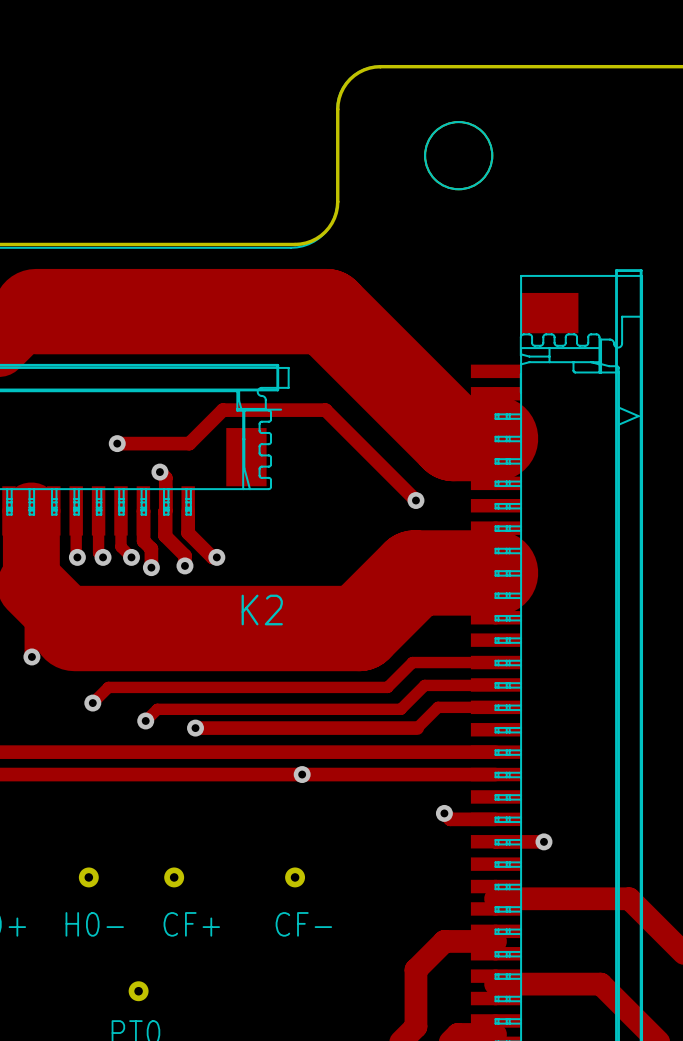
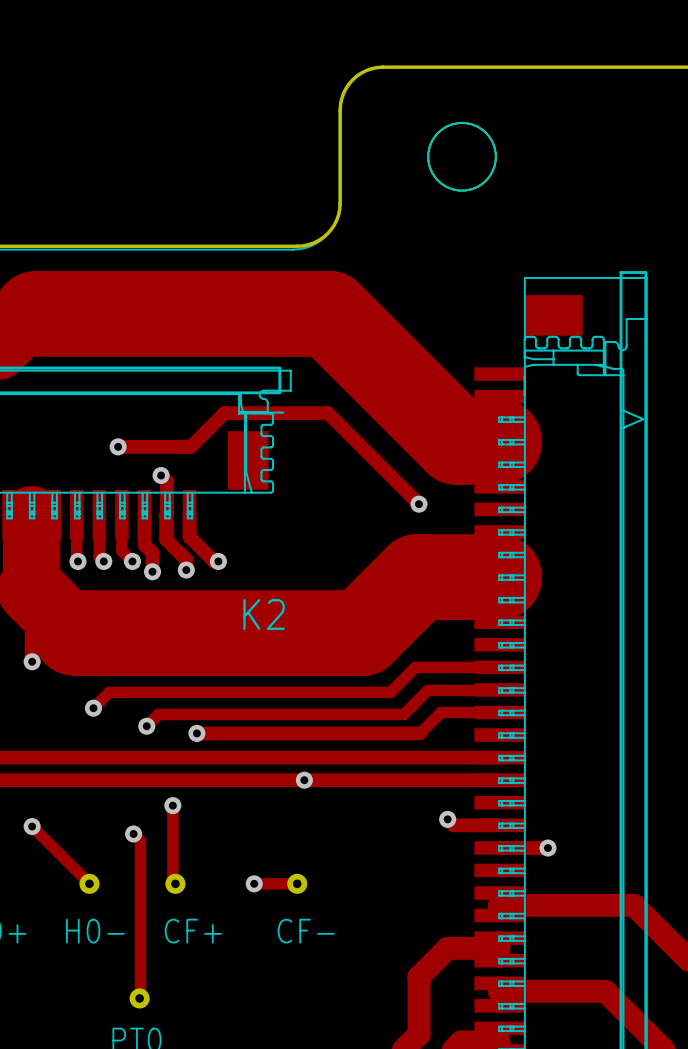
track: none -> (172, 805) (172, 881) (175, 883)
via: none -> (172, 805)
track: none -> (32, 826) (89, 883)
via: none -> (32, 826)
track: none -> (133, 833) (140, 840) (139, 998)
via: none -> (133, 833)
track: none -> (254, 883) (297, 883)
via: none -> (254, 883)

